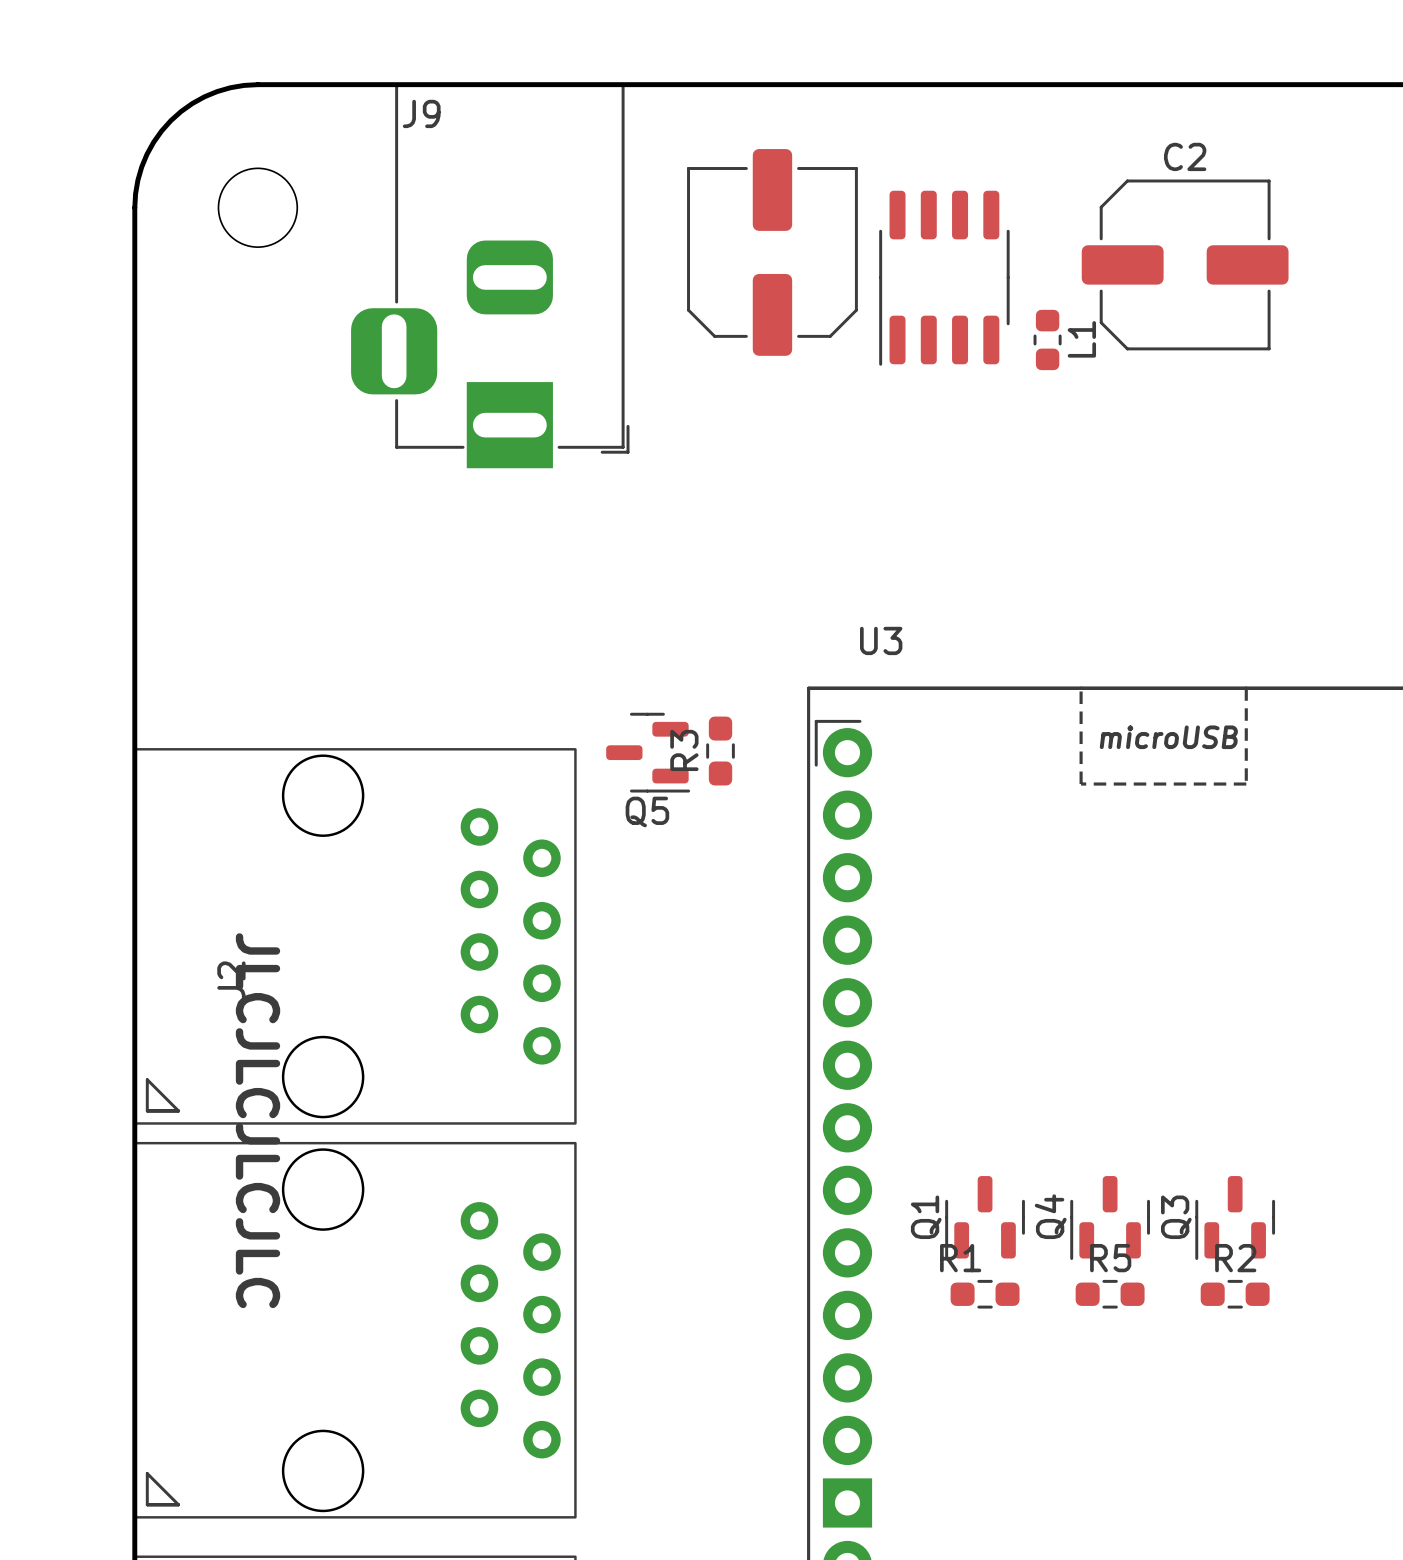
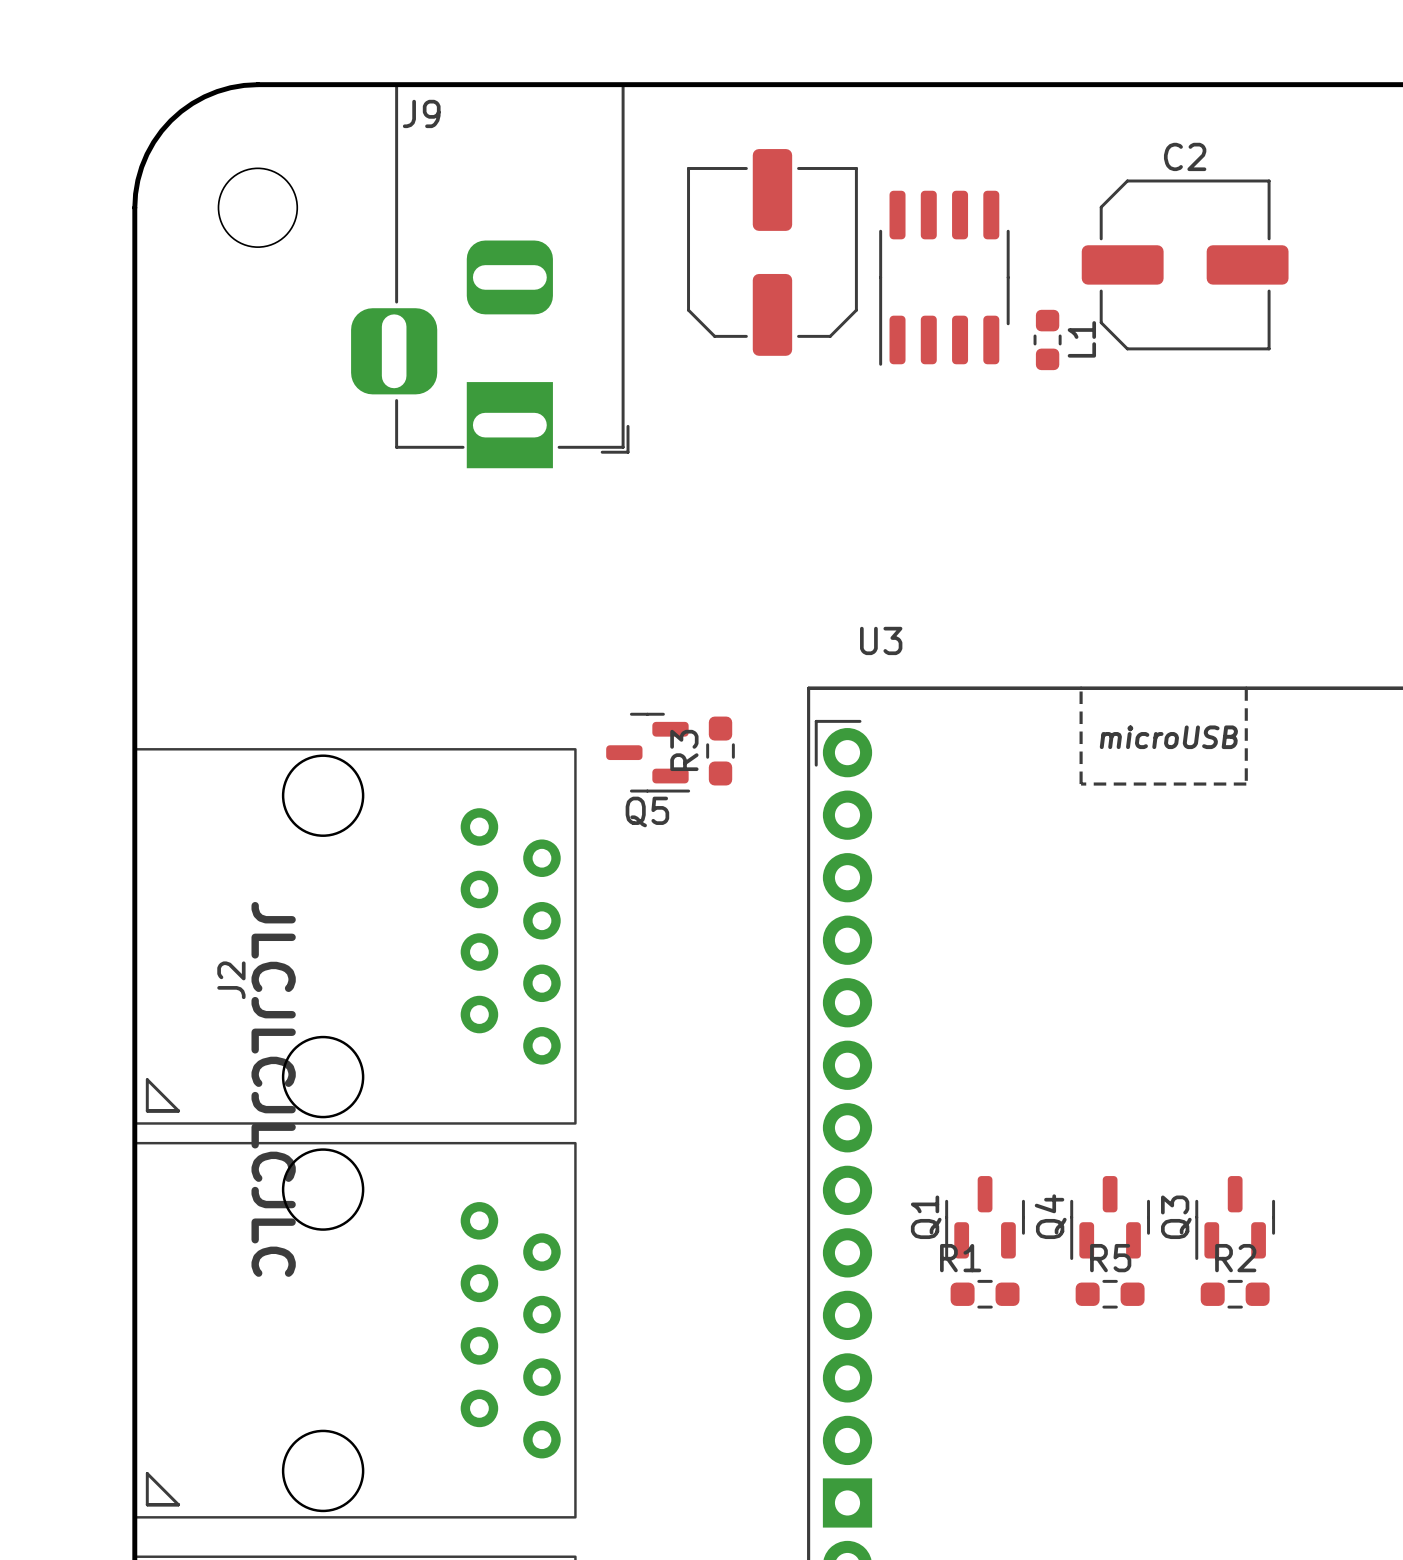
text position: JLCJLCJLCJLC (258, 1120) -> JLCJLCJLCJLC (273, 1089)

